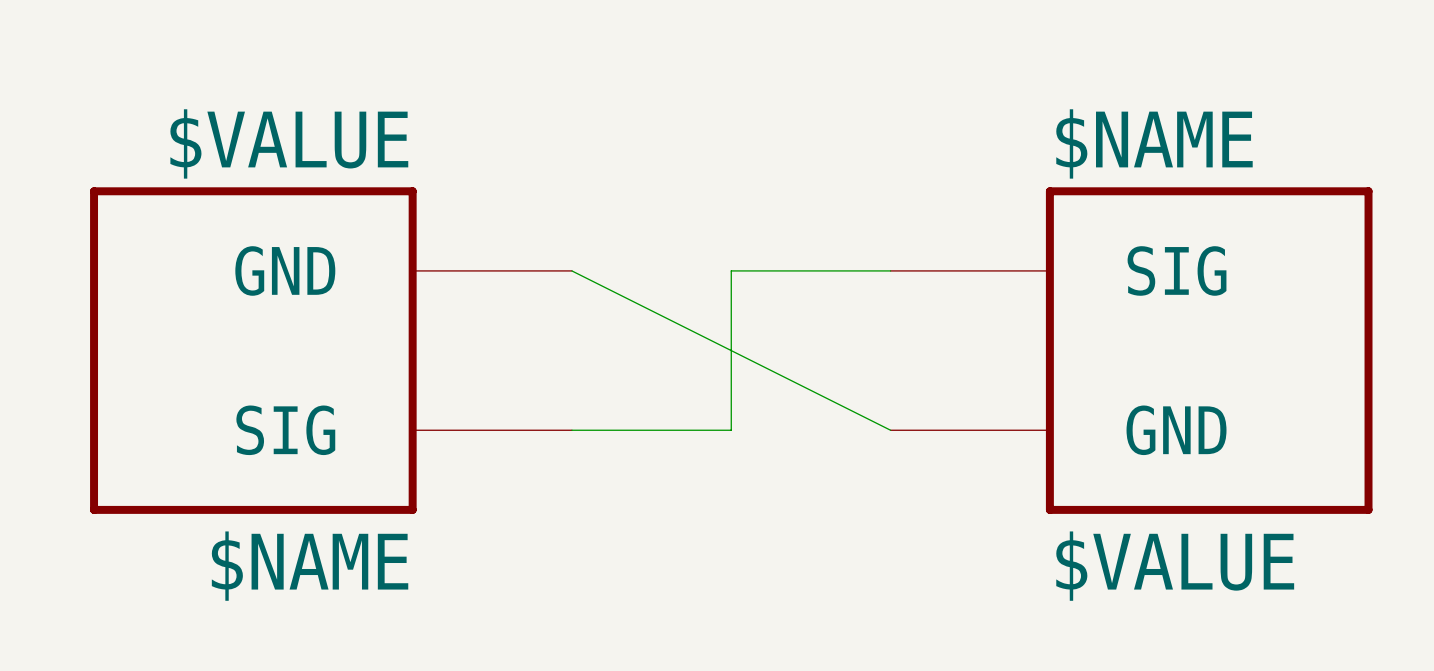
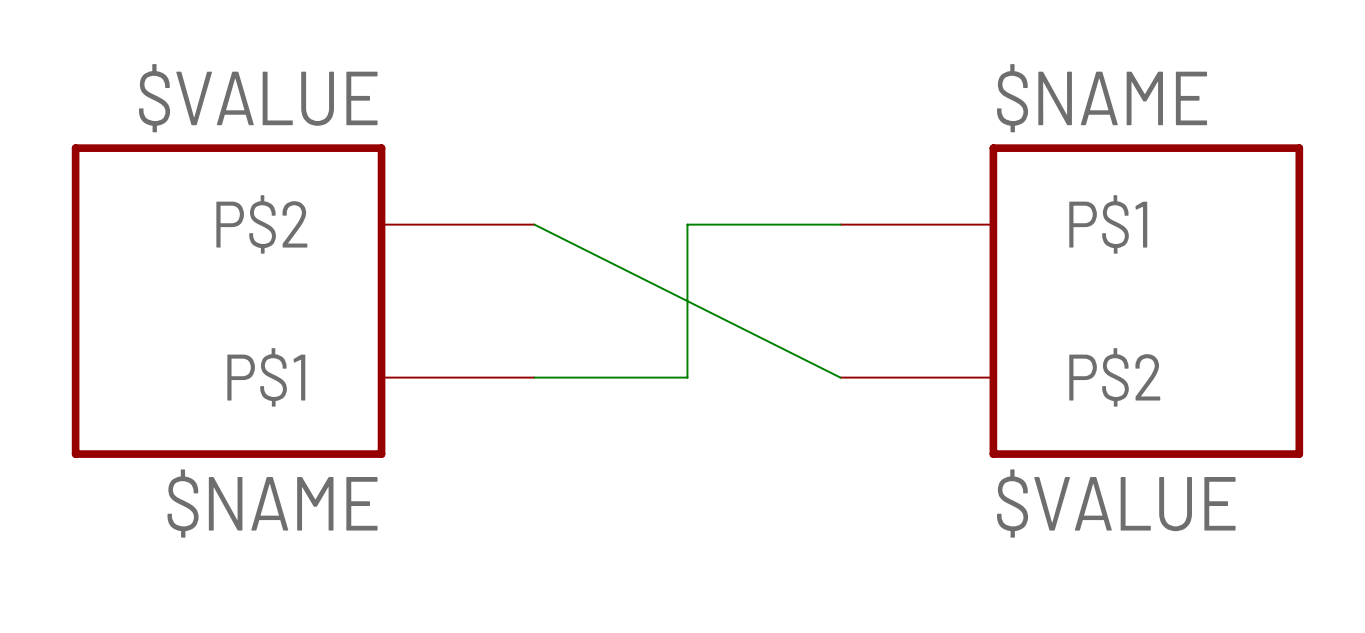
part pin name: GND (285, 270) -> P$2 (261, 224)
part pin name: SIG (1177, 270) -> P$1 (1108, 224)
part pin name: SIG (285, 430) -> P$1 (266, 377)
part pin name: GND (1176, 430) -> P$2 (1114, 377)

